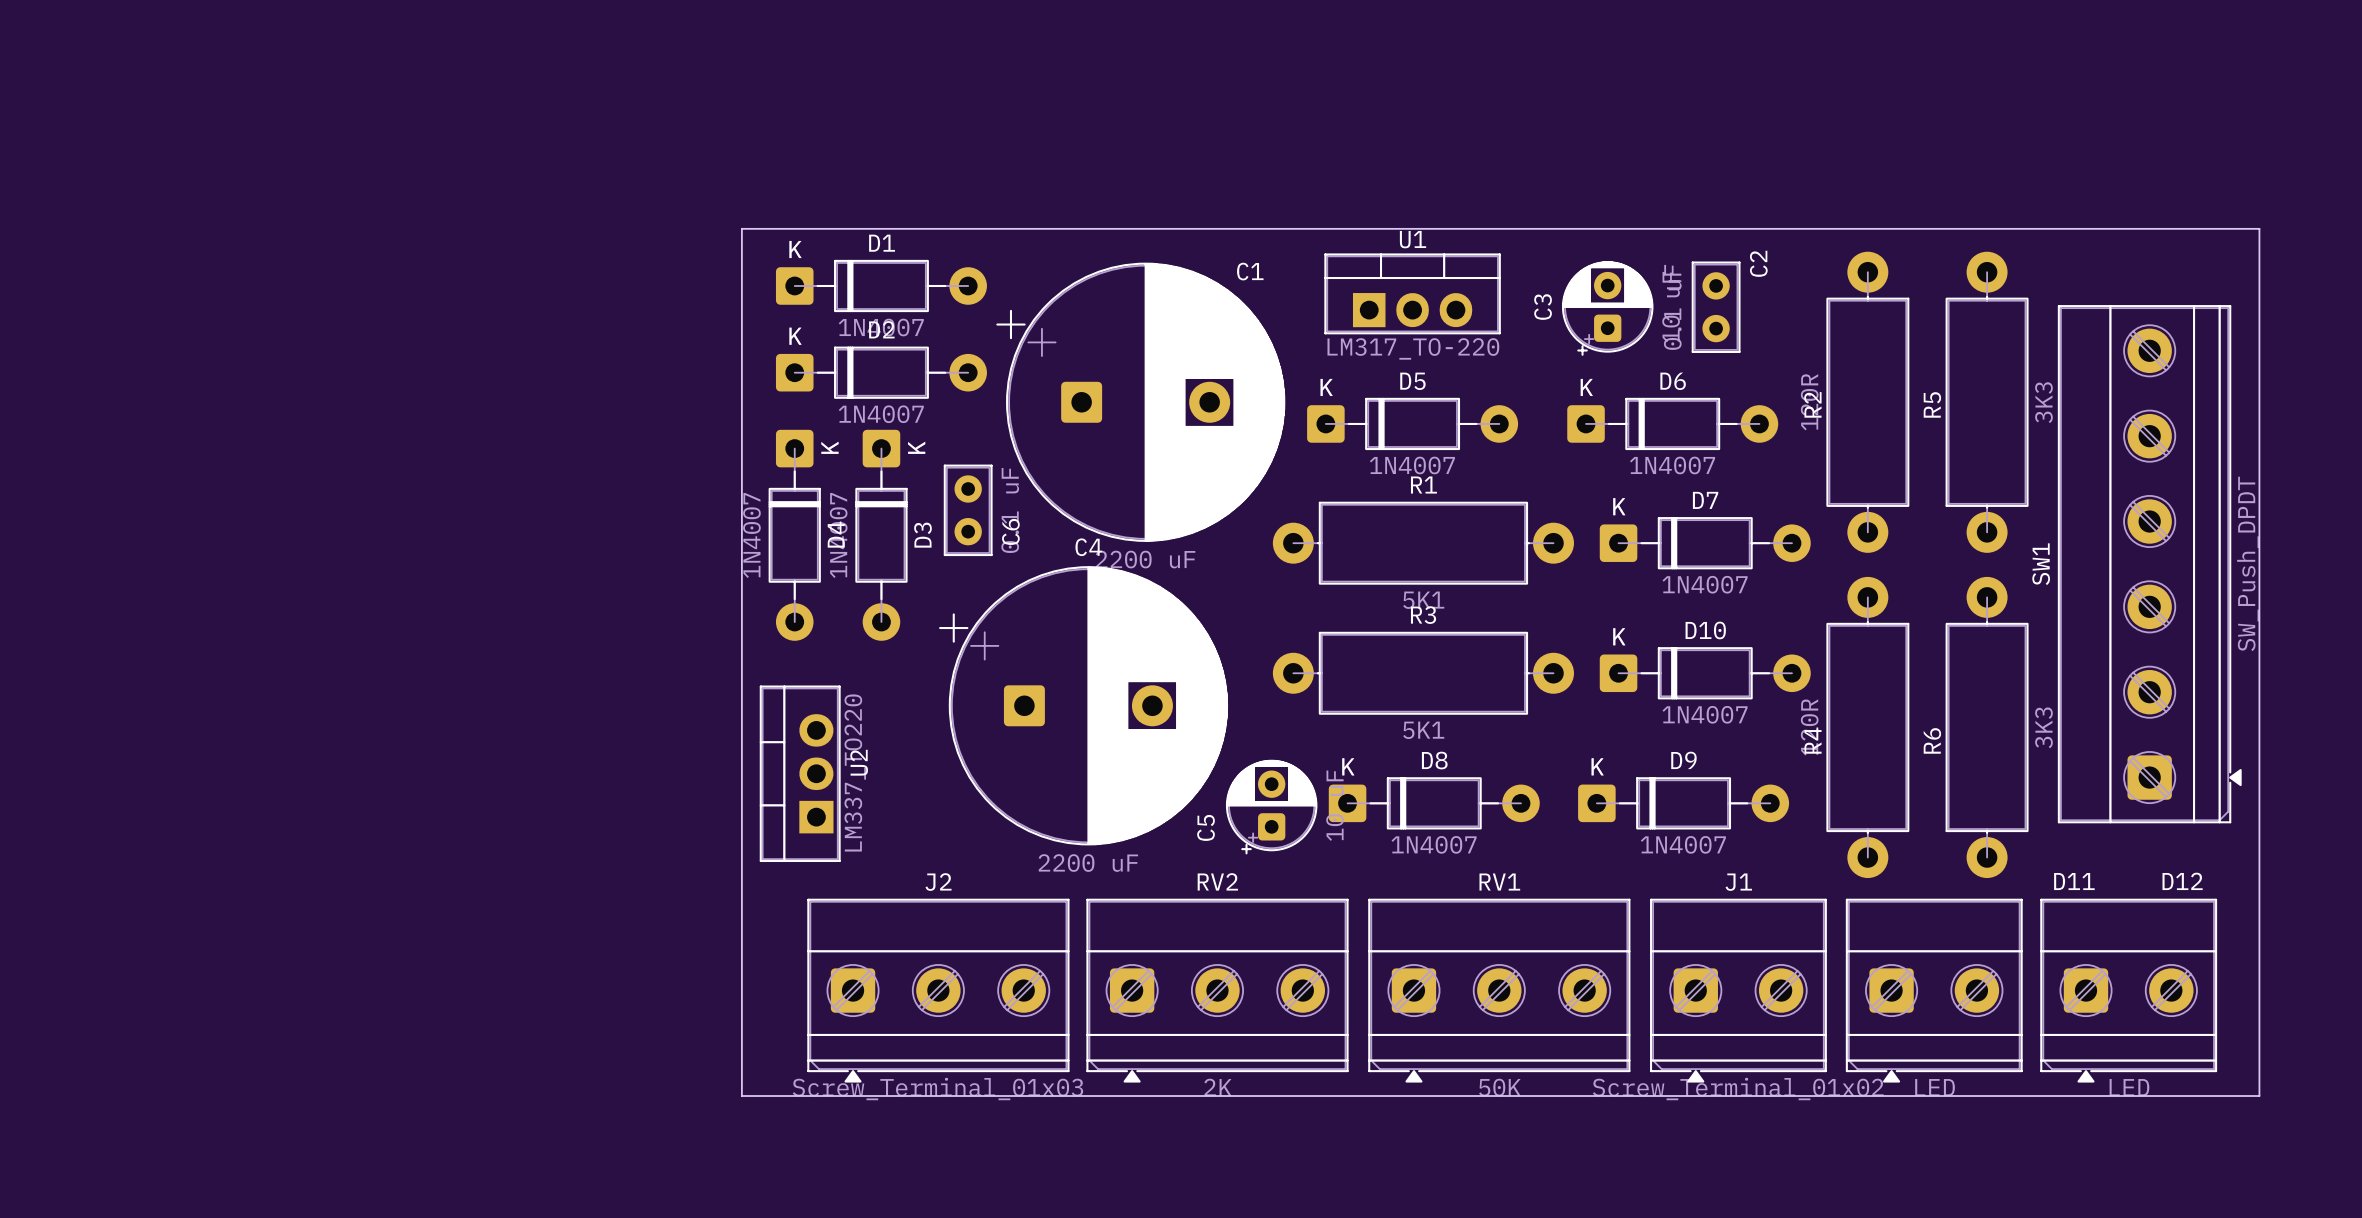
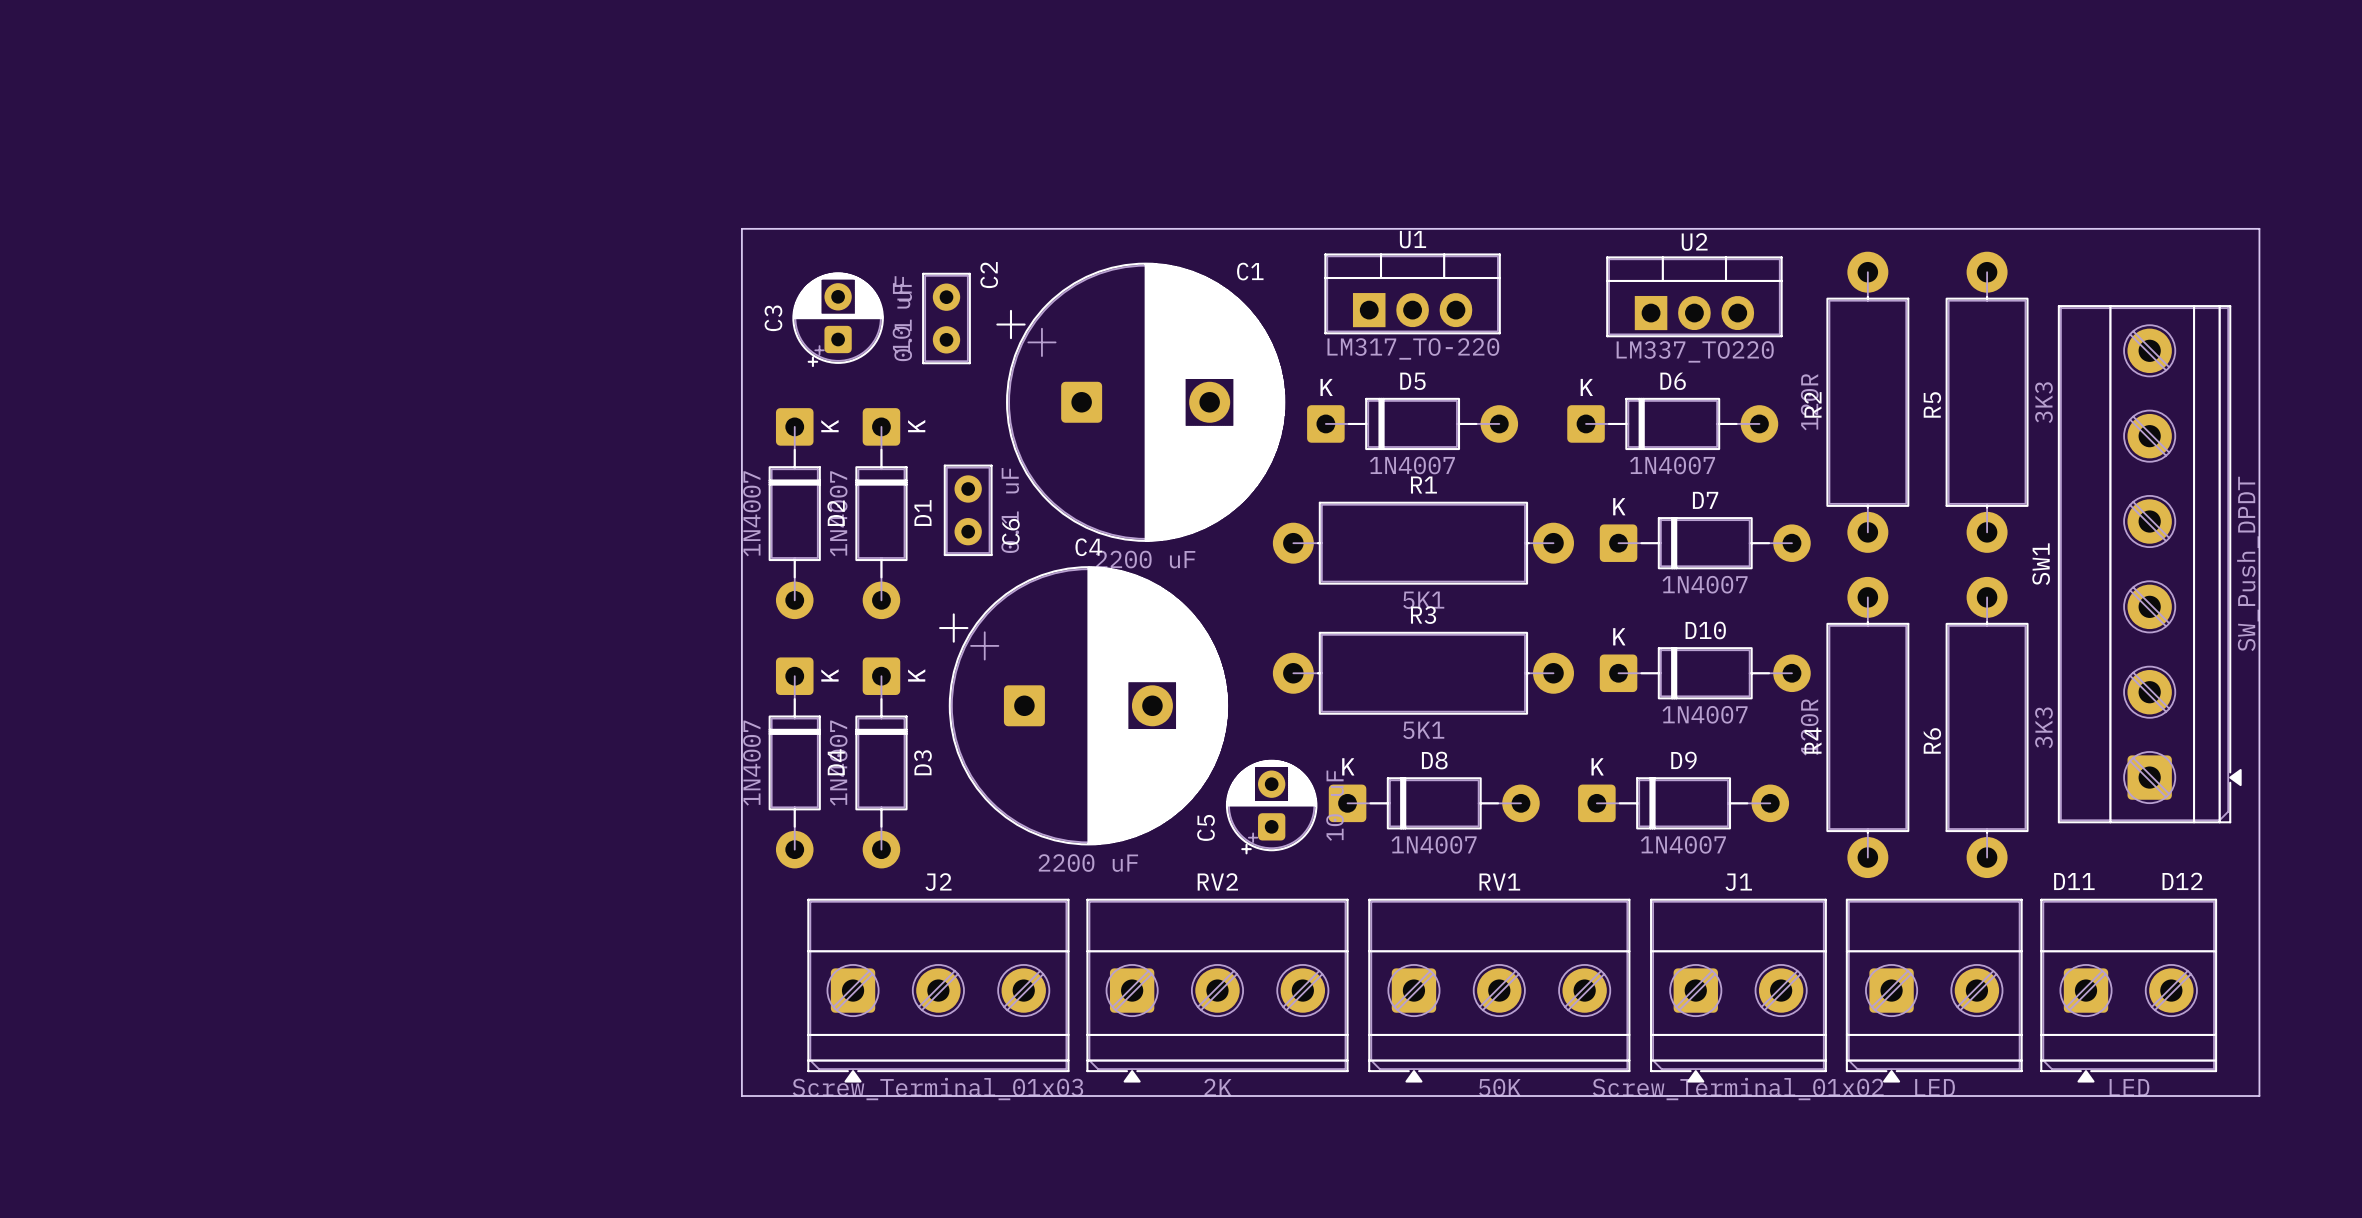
D1 rotation: 0° (881, 285) -> 90° clockwise (881, 513)
D1 position: (881, 285) -> (881, 513)
C2 position: (1716, 307) -> (946, 318)
C3 position: (1607, 308) -> (838, 319)
D2 rotation: 0° (881, 372) -> 90° clockwise (794, 513)
D2 position: (881, 372) -> (794, 513)
D4 position: (794, 535) -> (794, 762)
D3 position: (881, 535) -> (881, 762)
U2 name position: U2 (859, 762) -> U2 (1694, 241)
U2 rotation: 0° (800, 773) -> 90° clockwise (1694, 296)
U2 position: (800, 773) -> (1694, 296)

